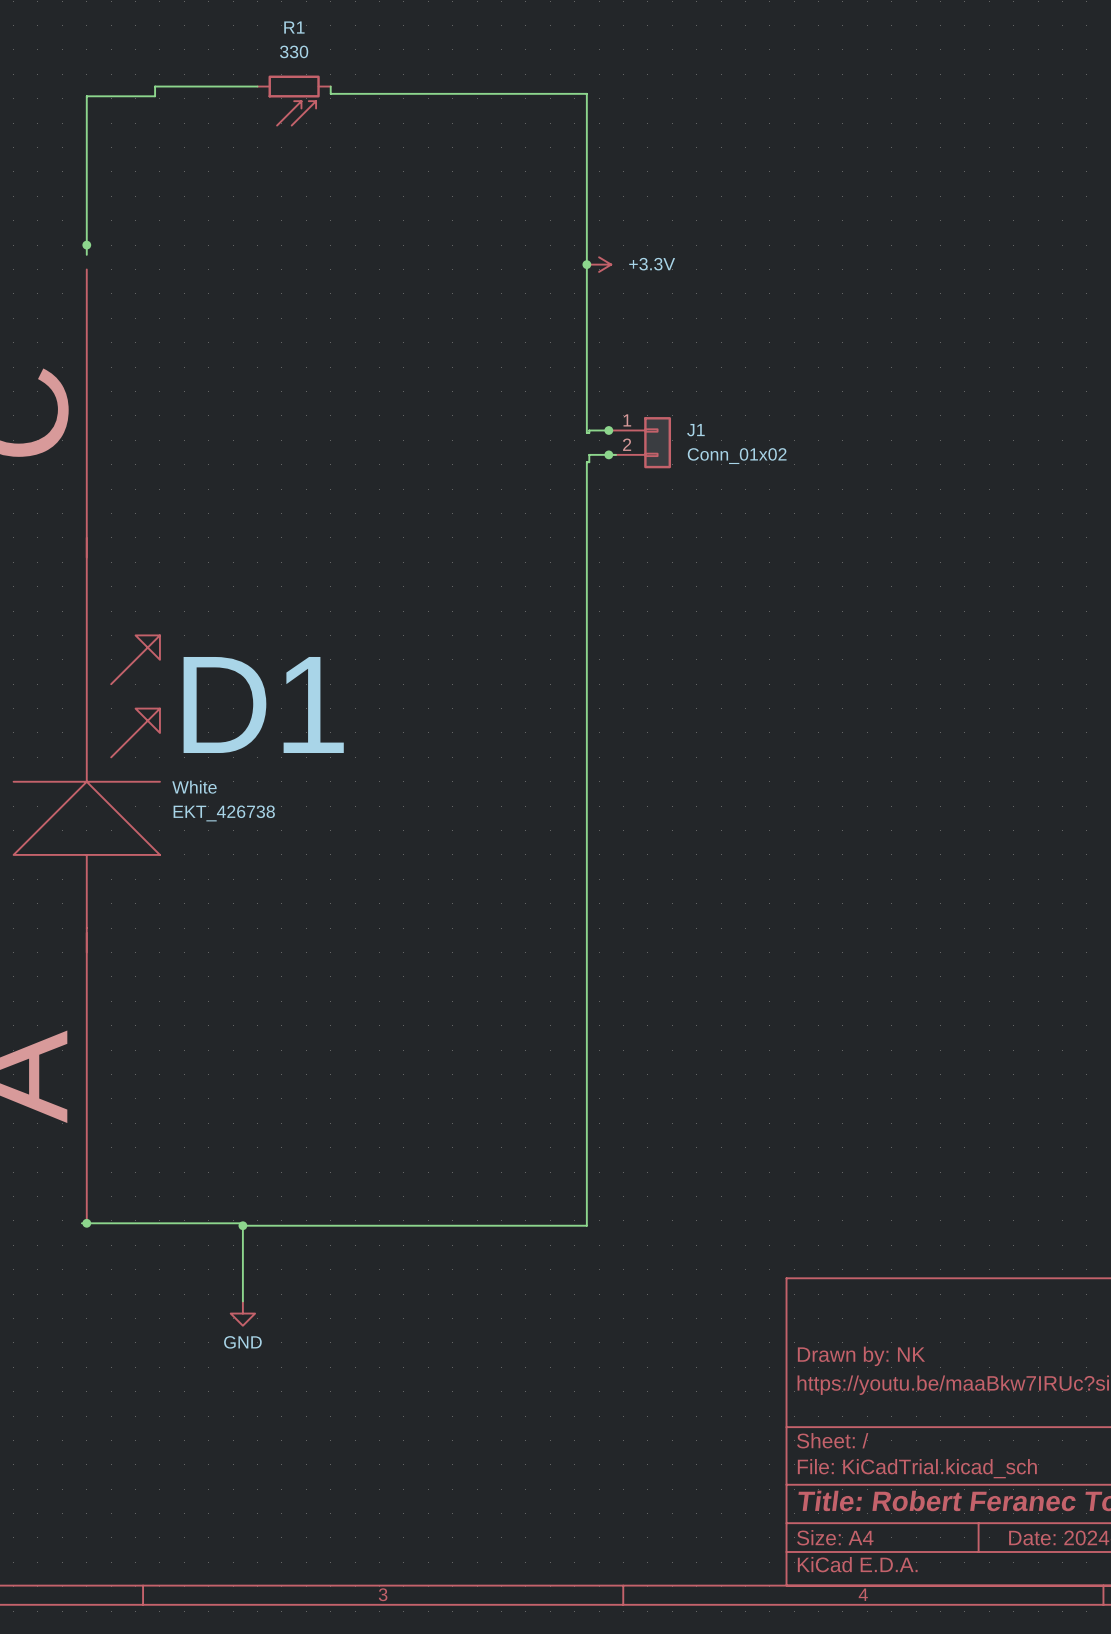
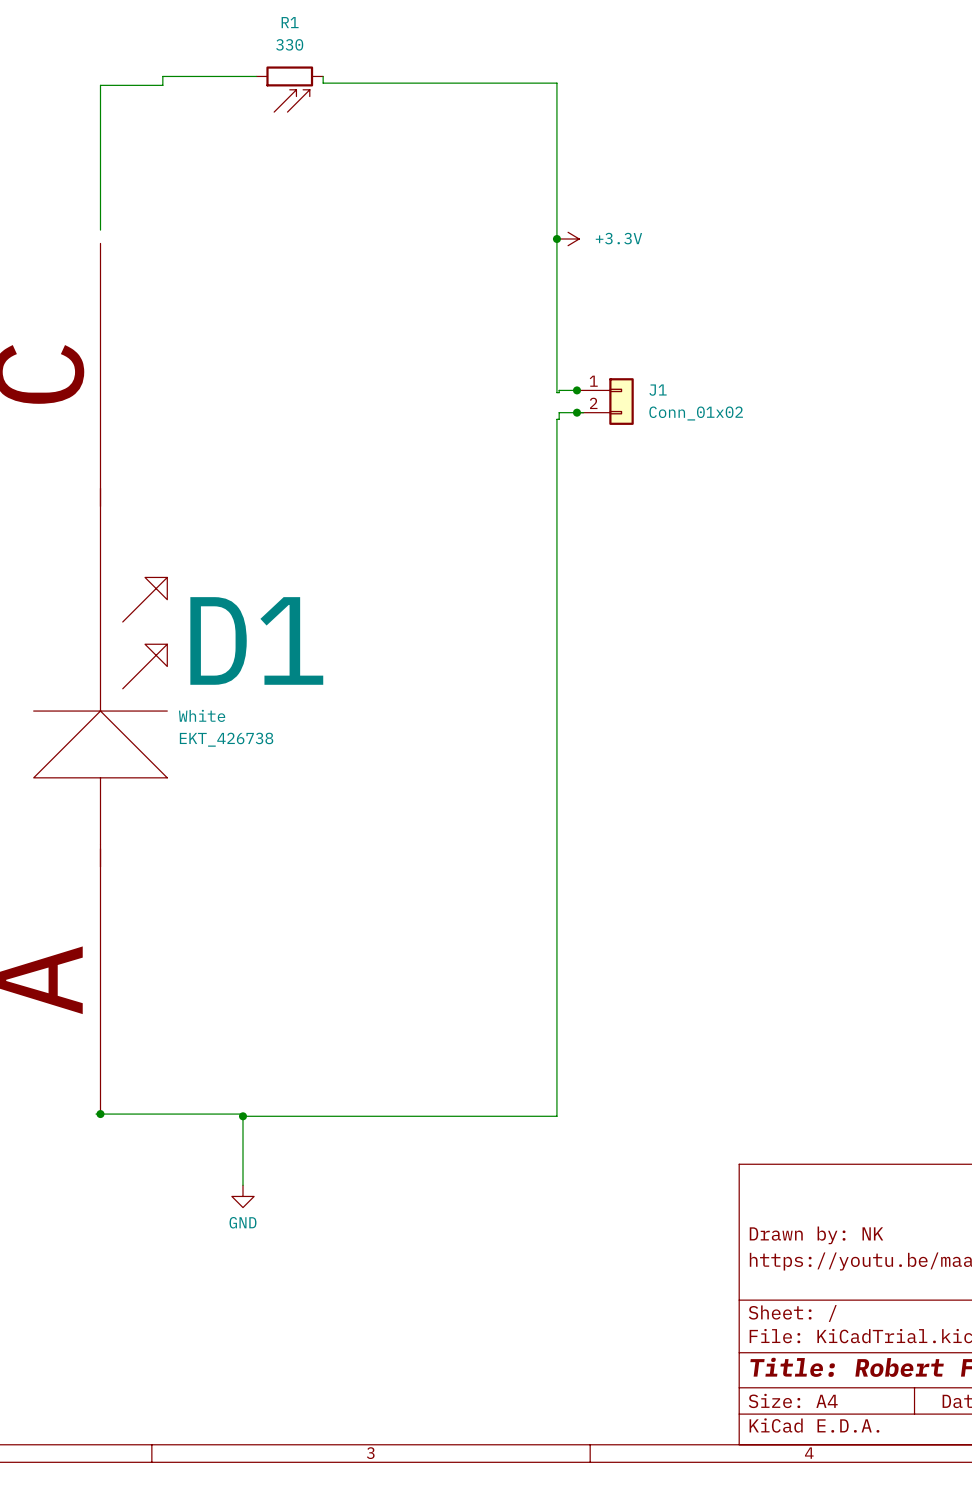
junction: (86, 245) -> none

